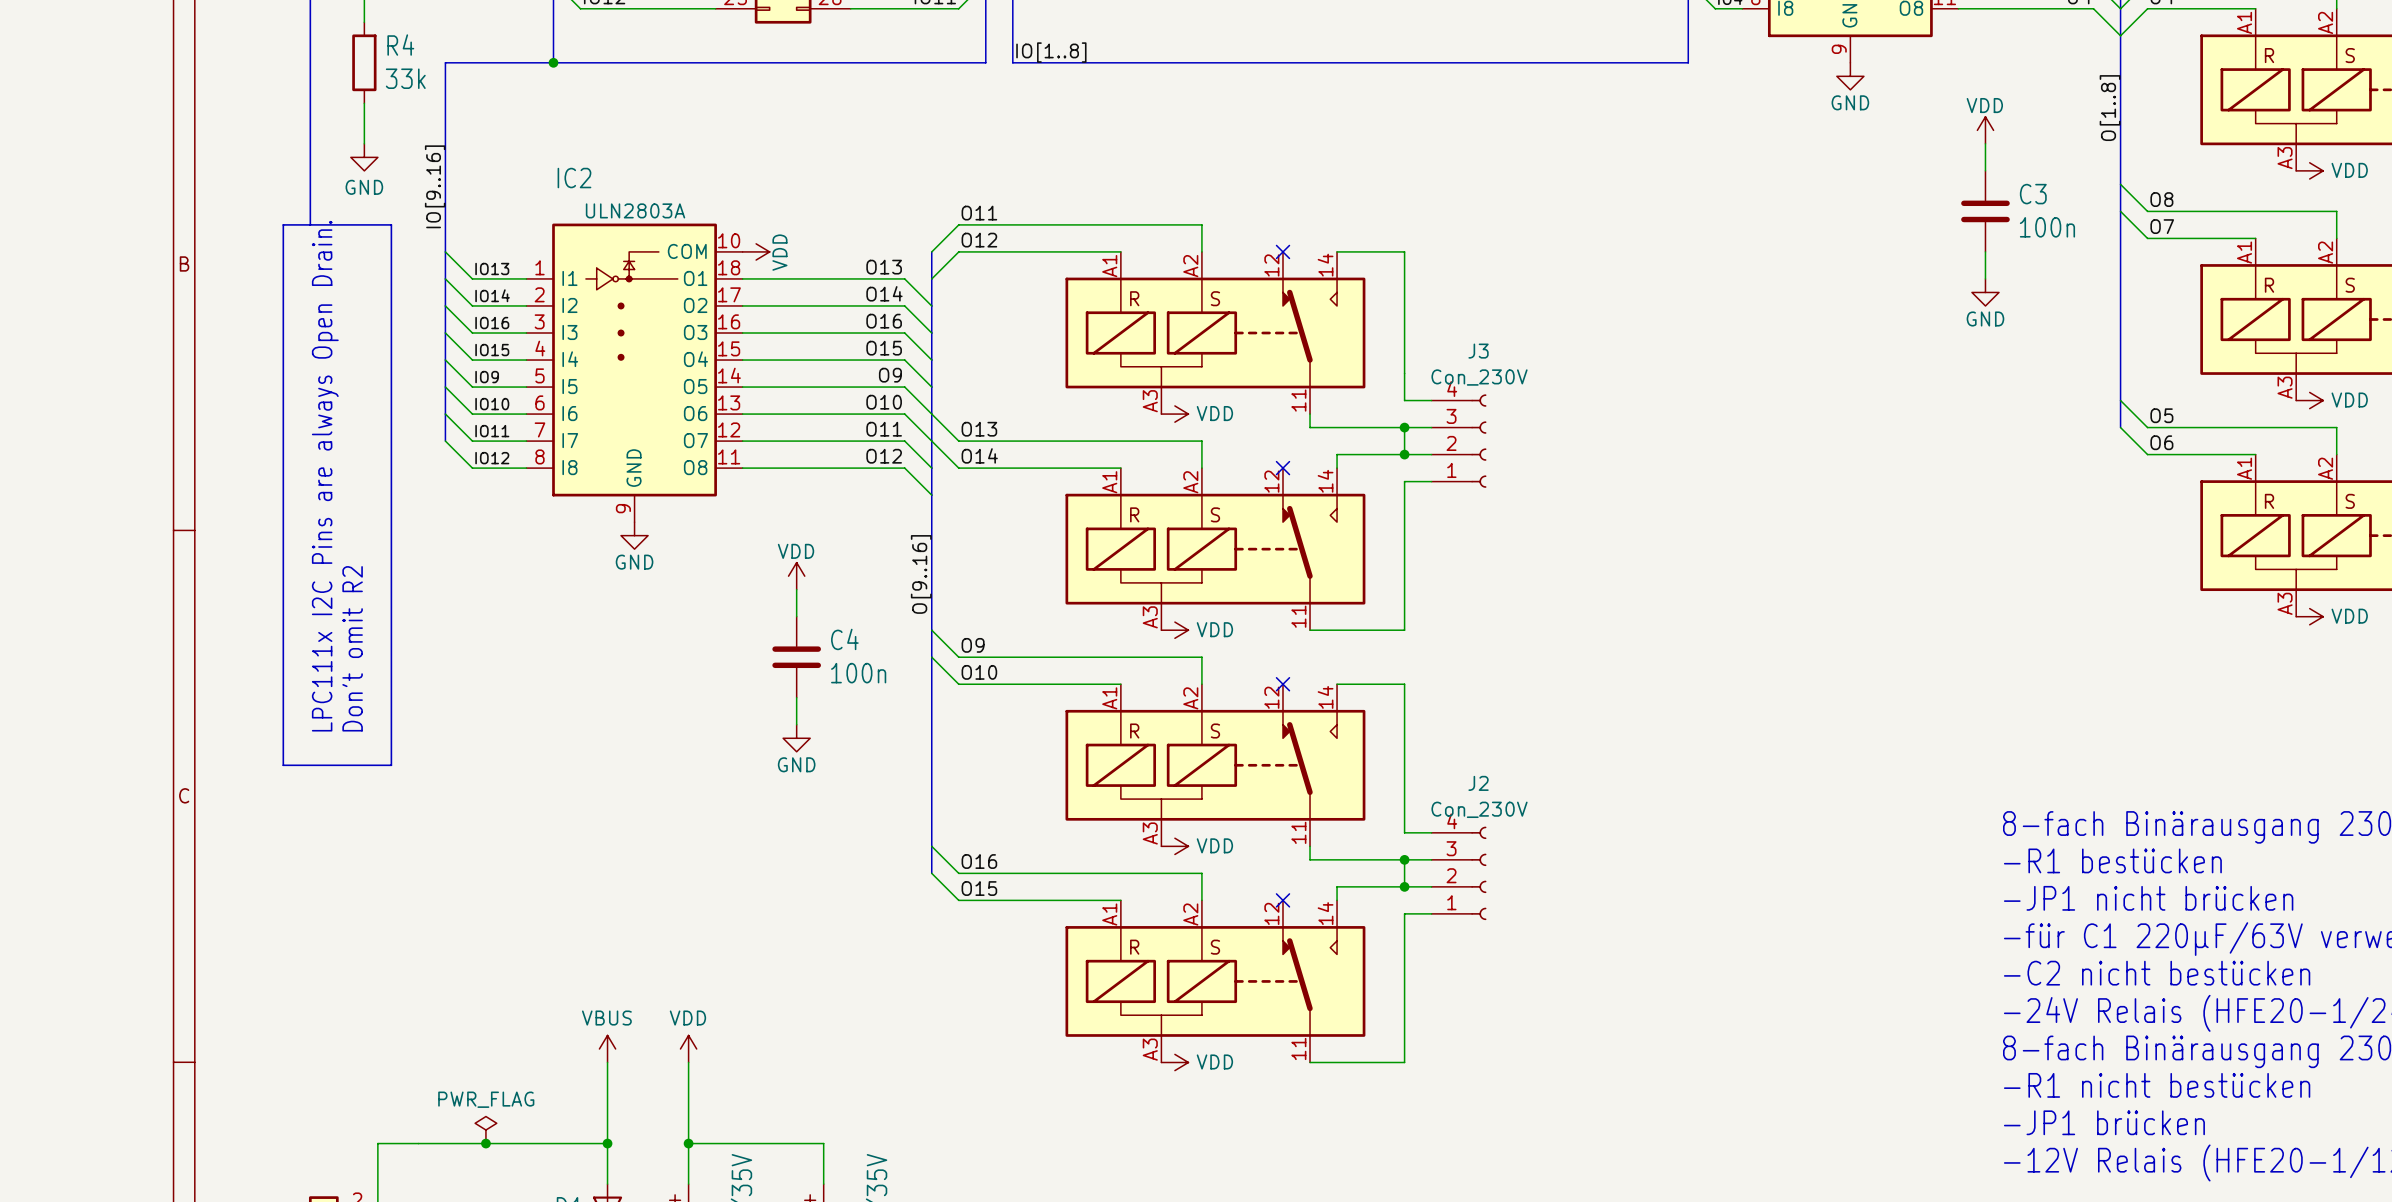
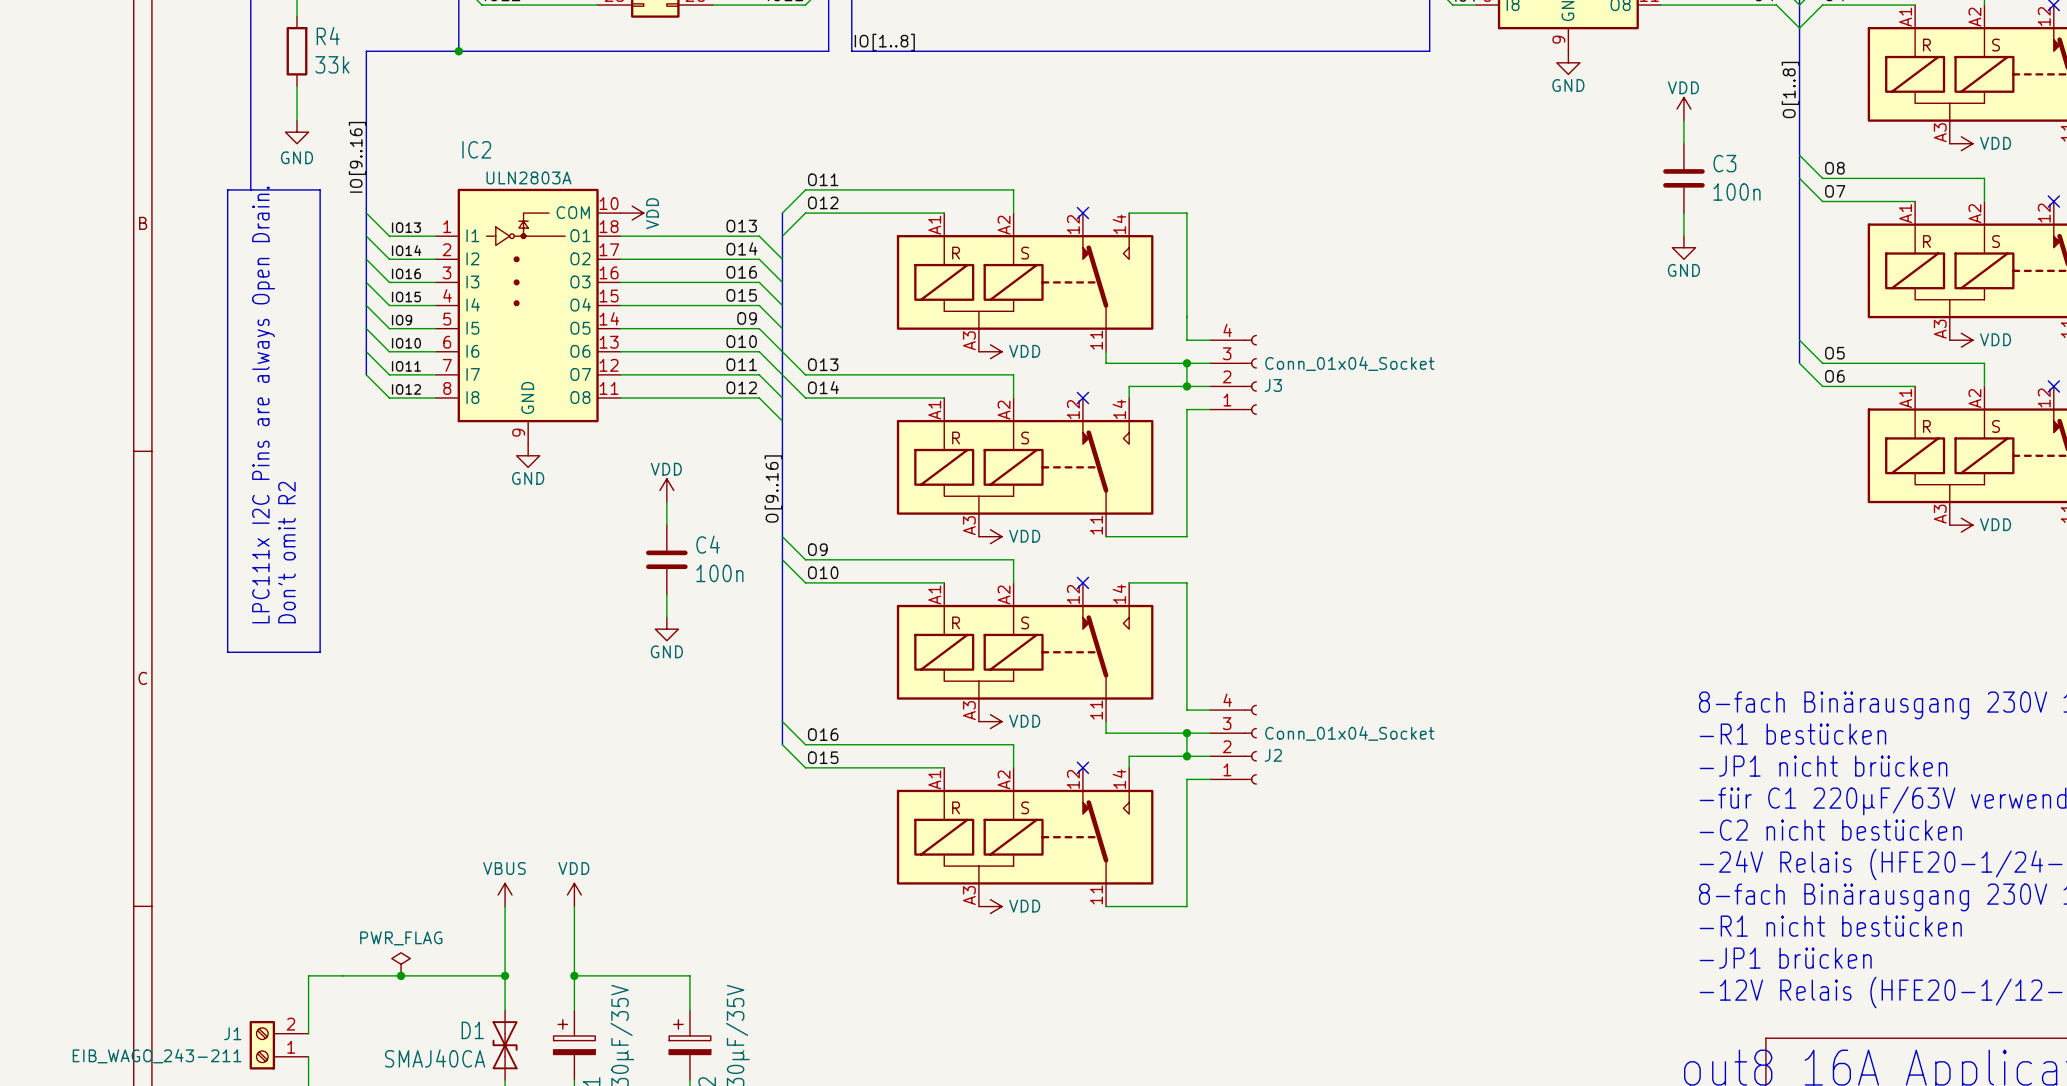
J3 name position: J3 (1478, 351) -> J3 (1273, 385)
J3 value: Con_230V (1479, 377) -> Conn_01x04_Socket (1349, 363)
J2 name position: J2 (1478, 783) -> J2 (1273, 755)
J2 value: Con_230V (1479, 809) -> Conn_01x04_Socket (1349, 733)

